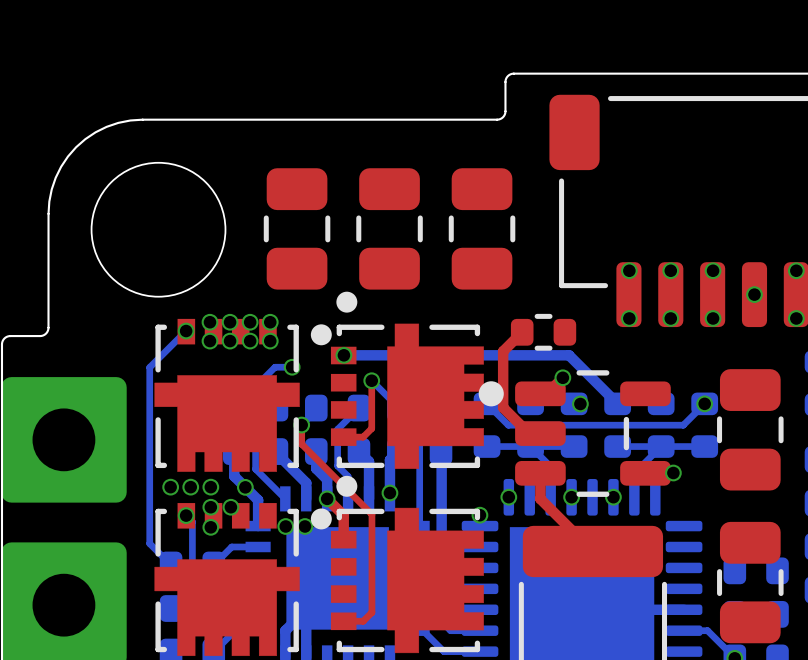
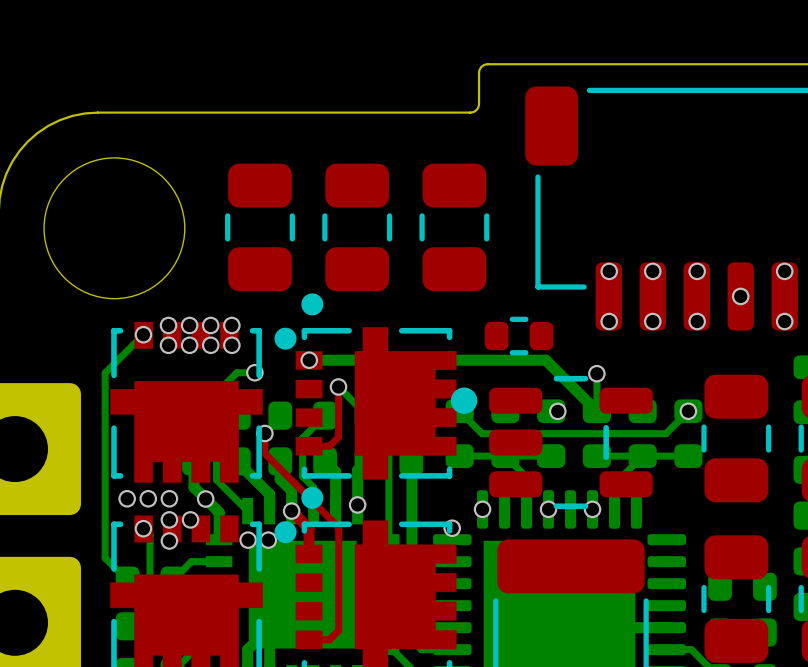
top track: (522, 332) (503, 351) (503, 407) (529, 433) (540, 433) -> none
bottom track: none -> (596, 373) (596, 411)
via position: (562, 377) -> (596, 373)
top track: (540, 473) (540, 498) (592, 551) -> none
via: (673, 473) -> none

